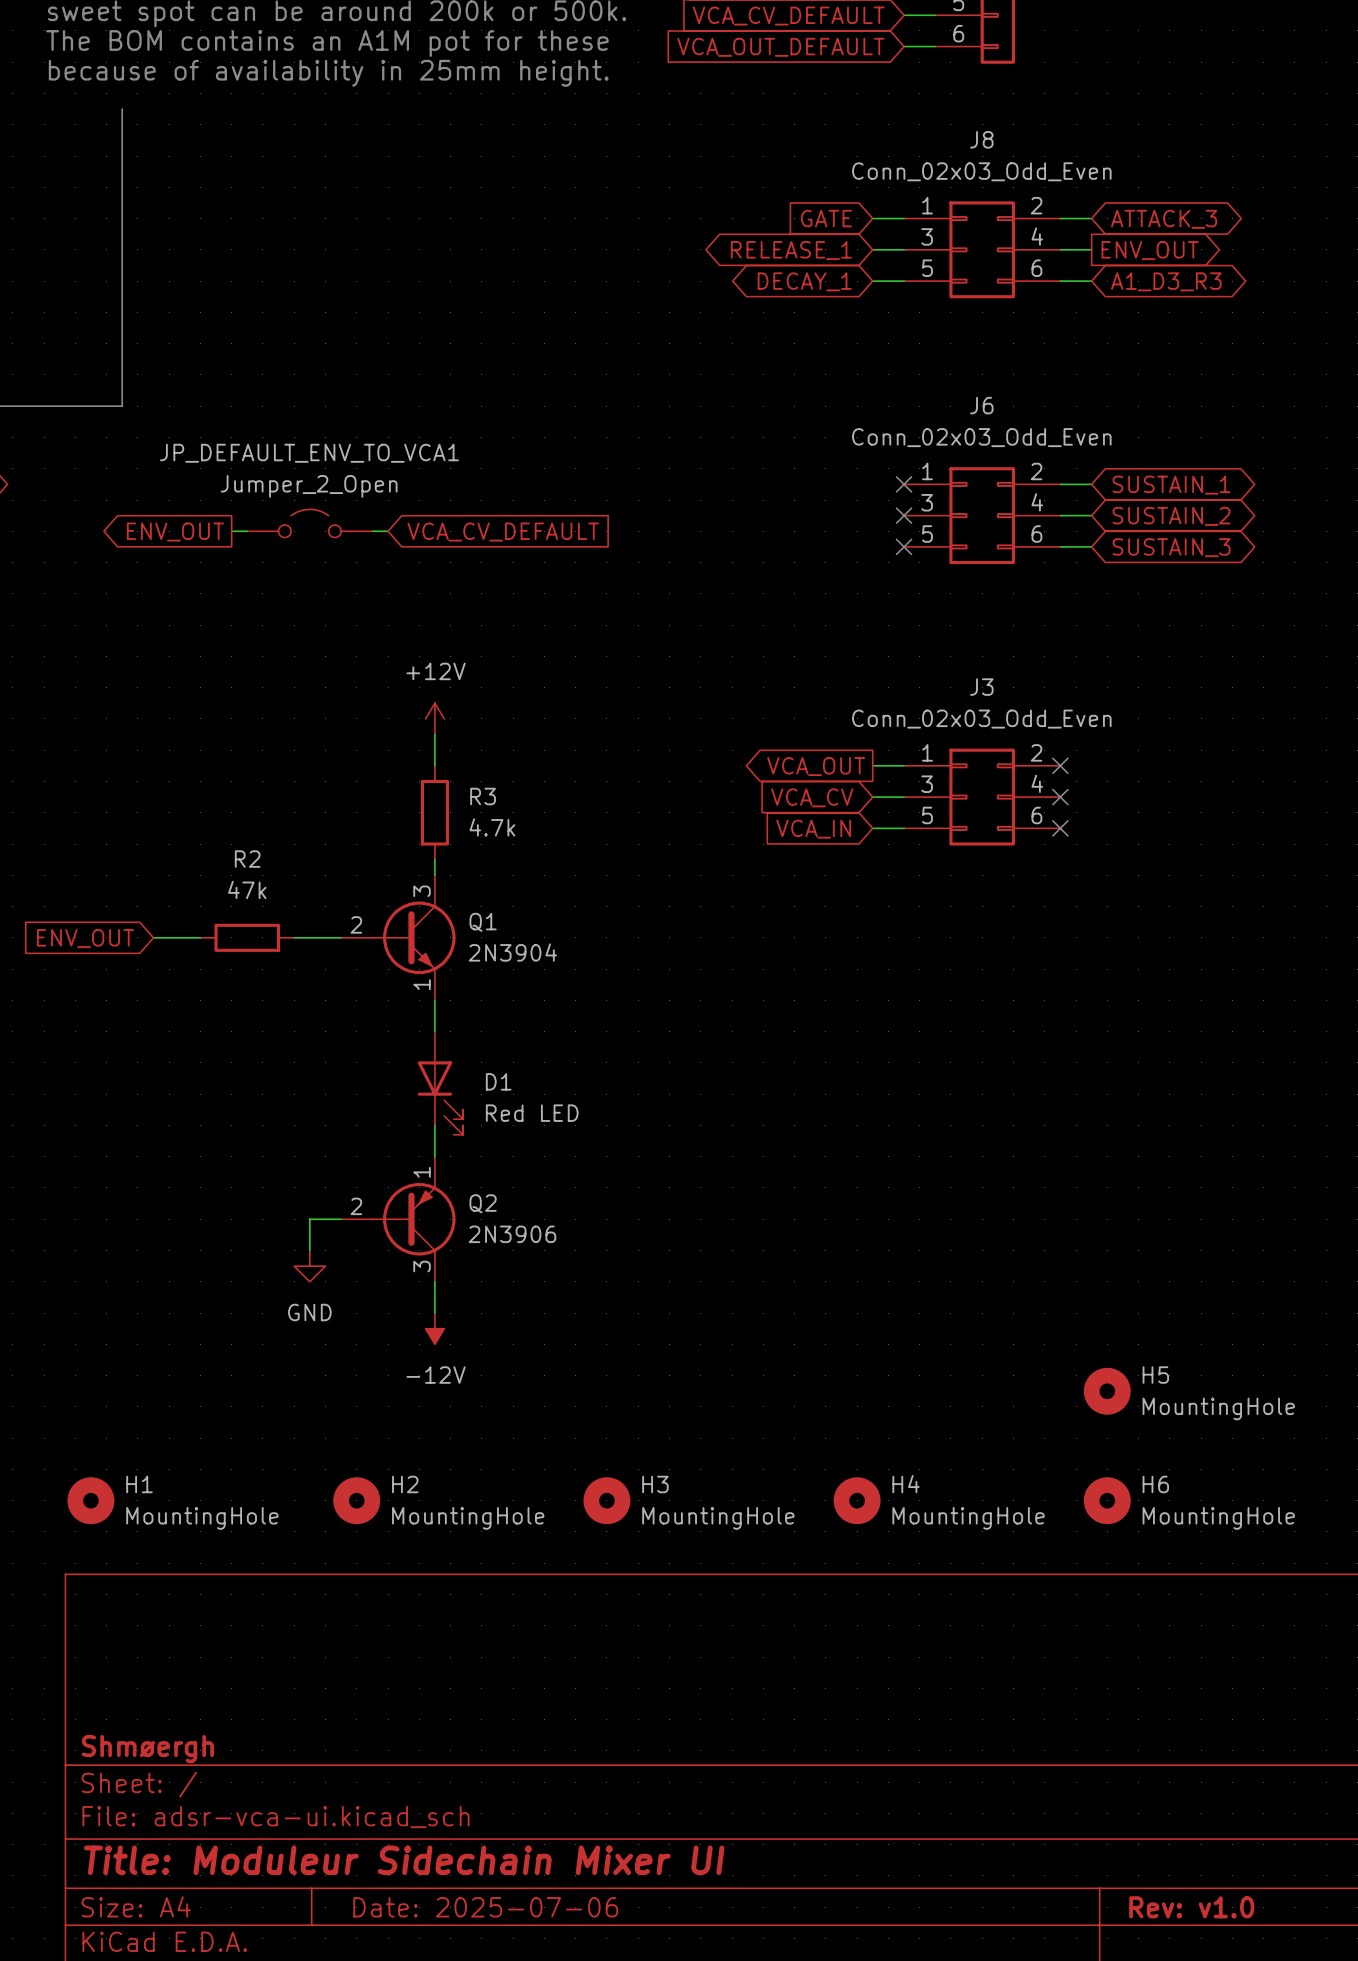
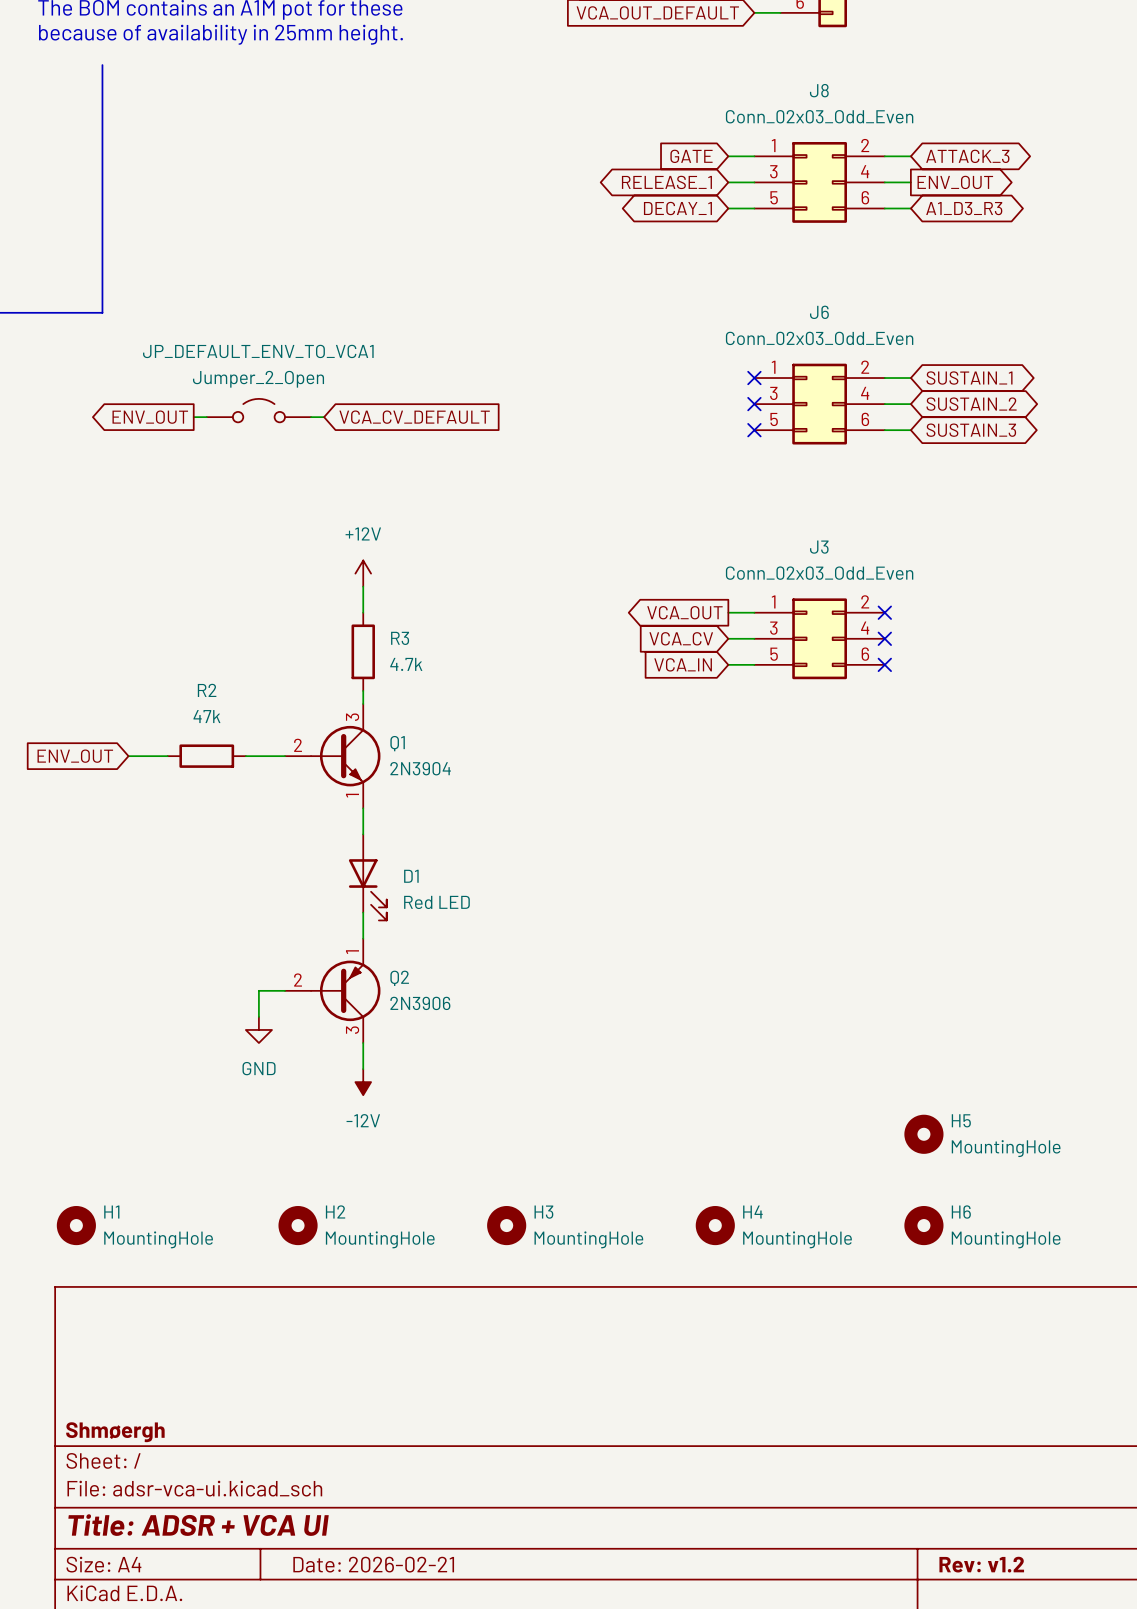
title block: Title: Moduleur Sidechain Mixer UI (404, 1860) -> Title: ADSR + VCA UI (198, 1525)
title block: Date: 2025-07-06 (485, 1907) -> Date: 2026-02-21 (373, 1564)
title block: Rev: v1.0 (1191, 1907) -> Rev: v1.2 (981, 1564)

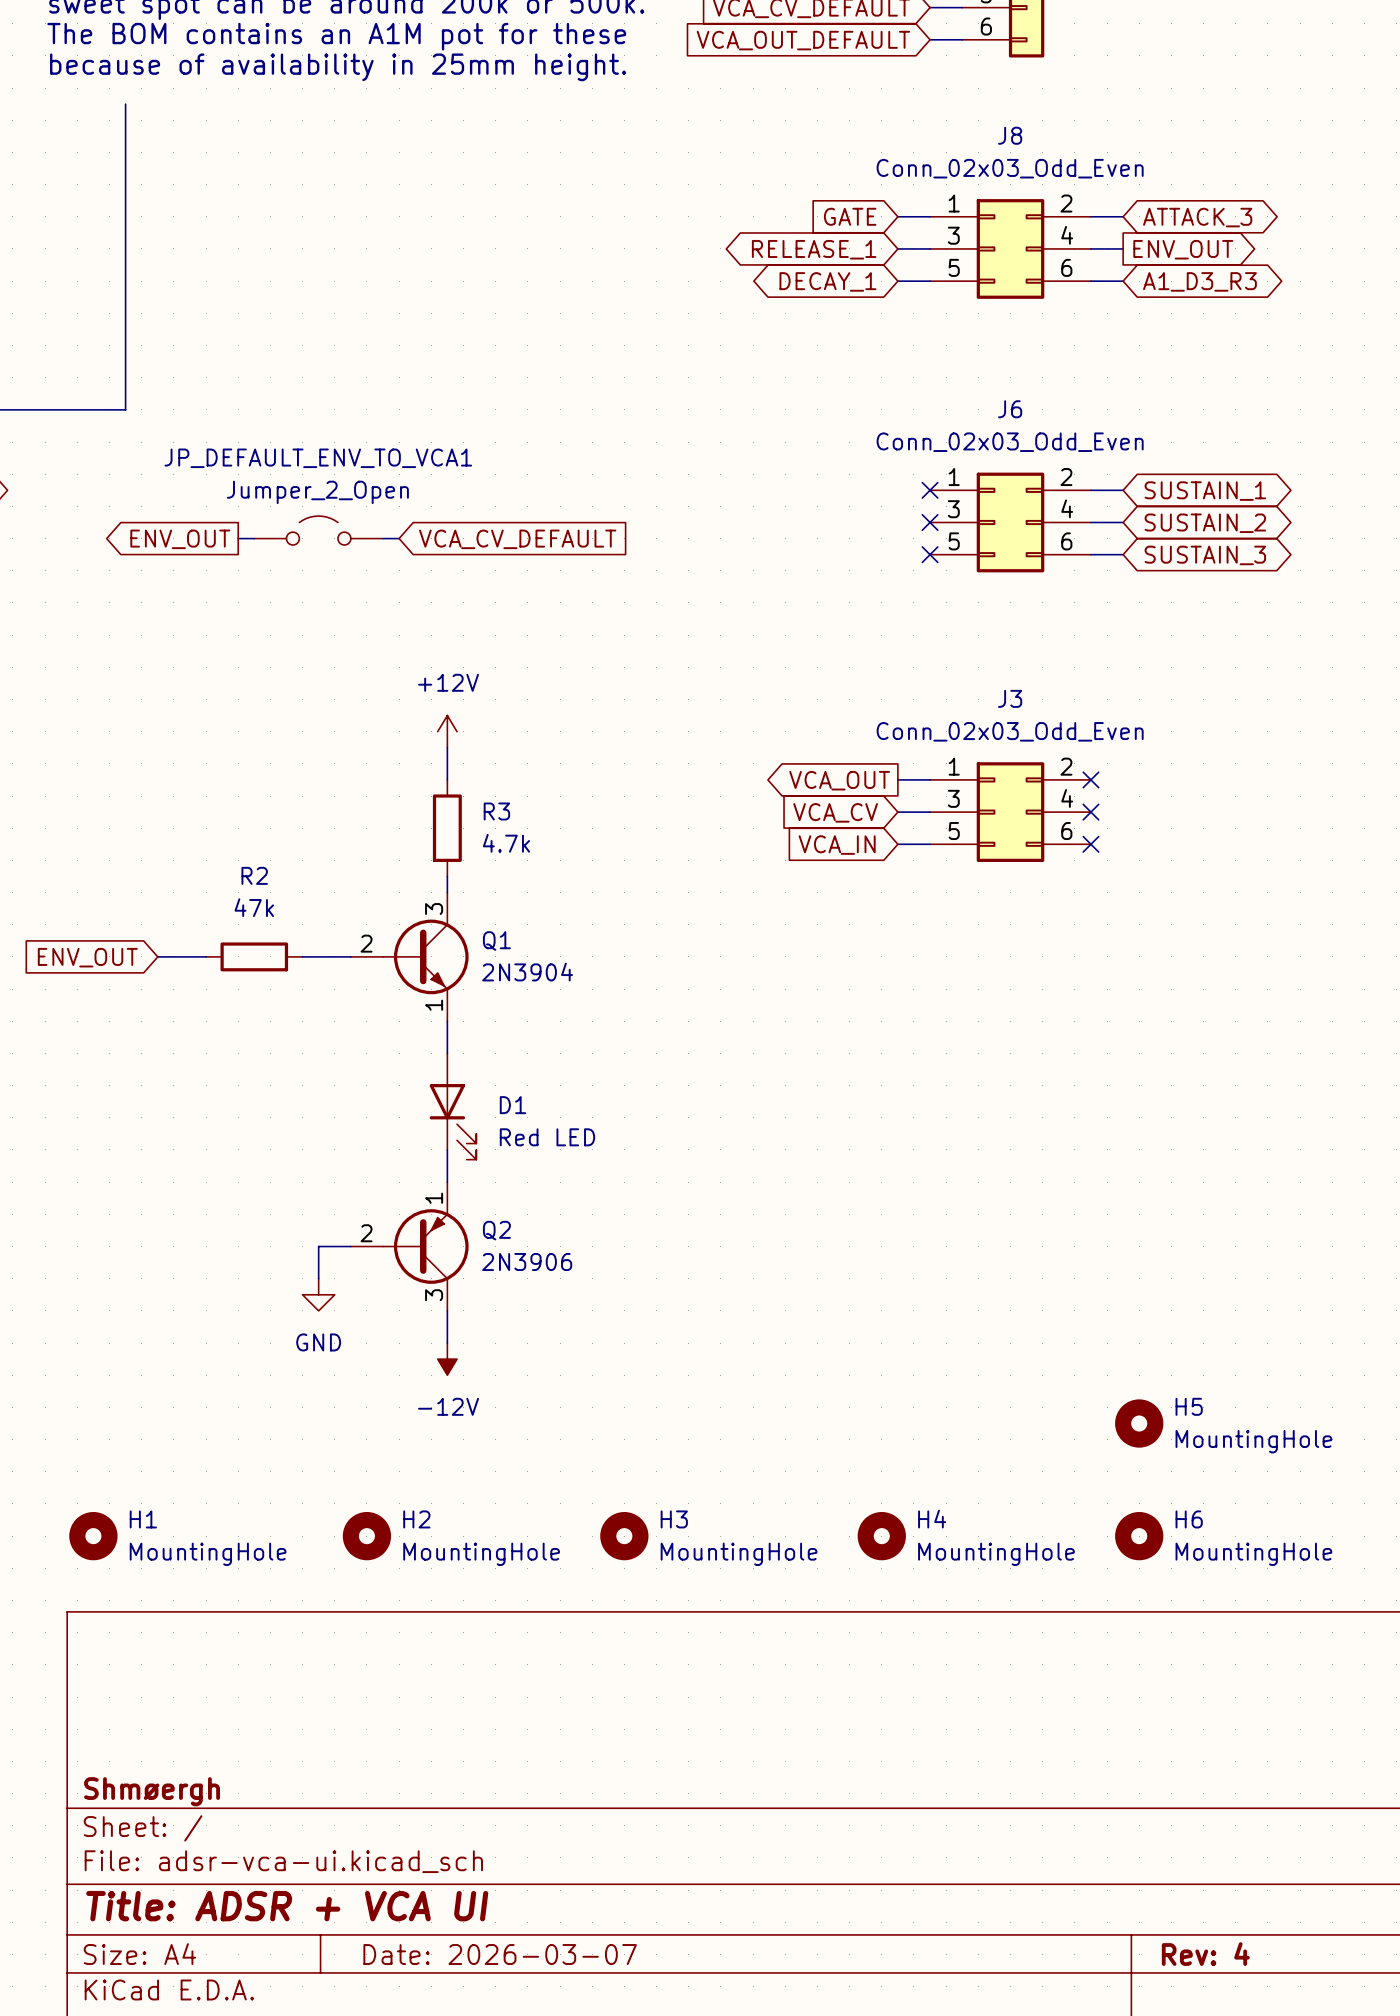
title block: Date: 2026-02-21 (373, 1564) -> Date: 2026-03-07 (500, 1954)
title block: Rev: v1.2 (981, 1564) -> Rev: 4 (1205, 1954)

